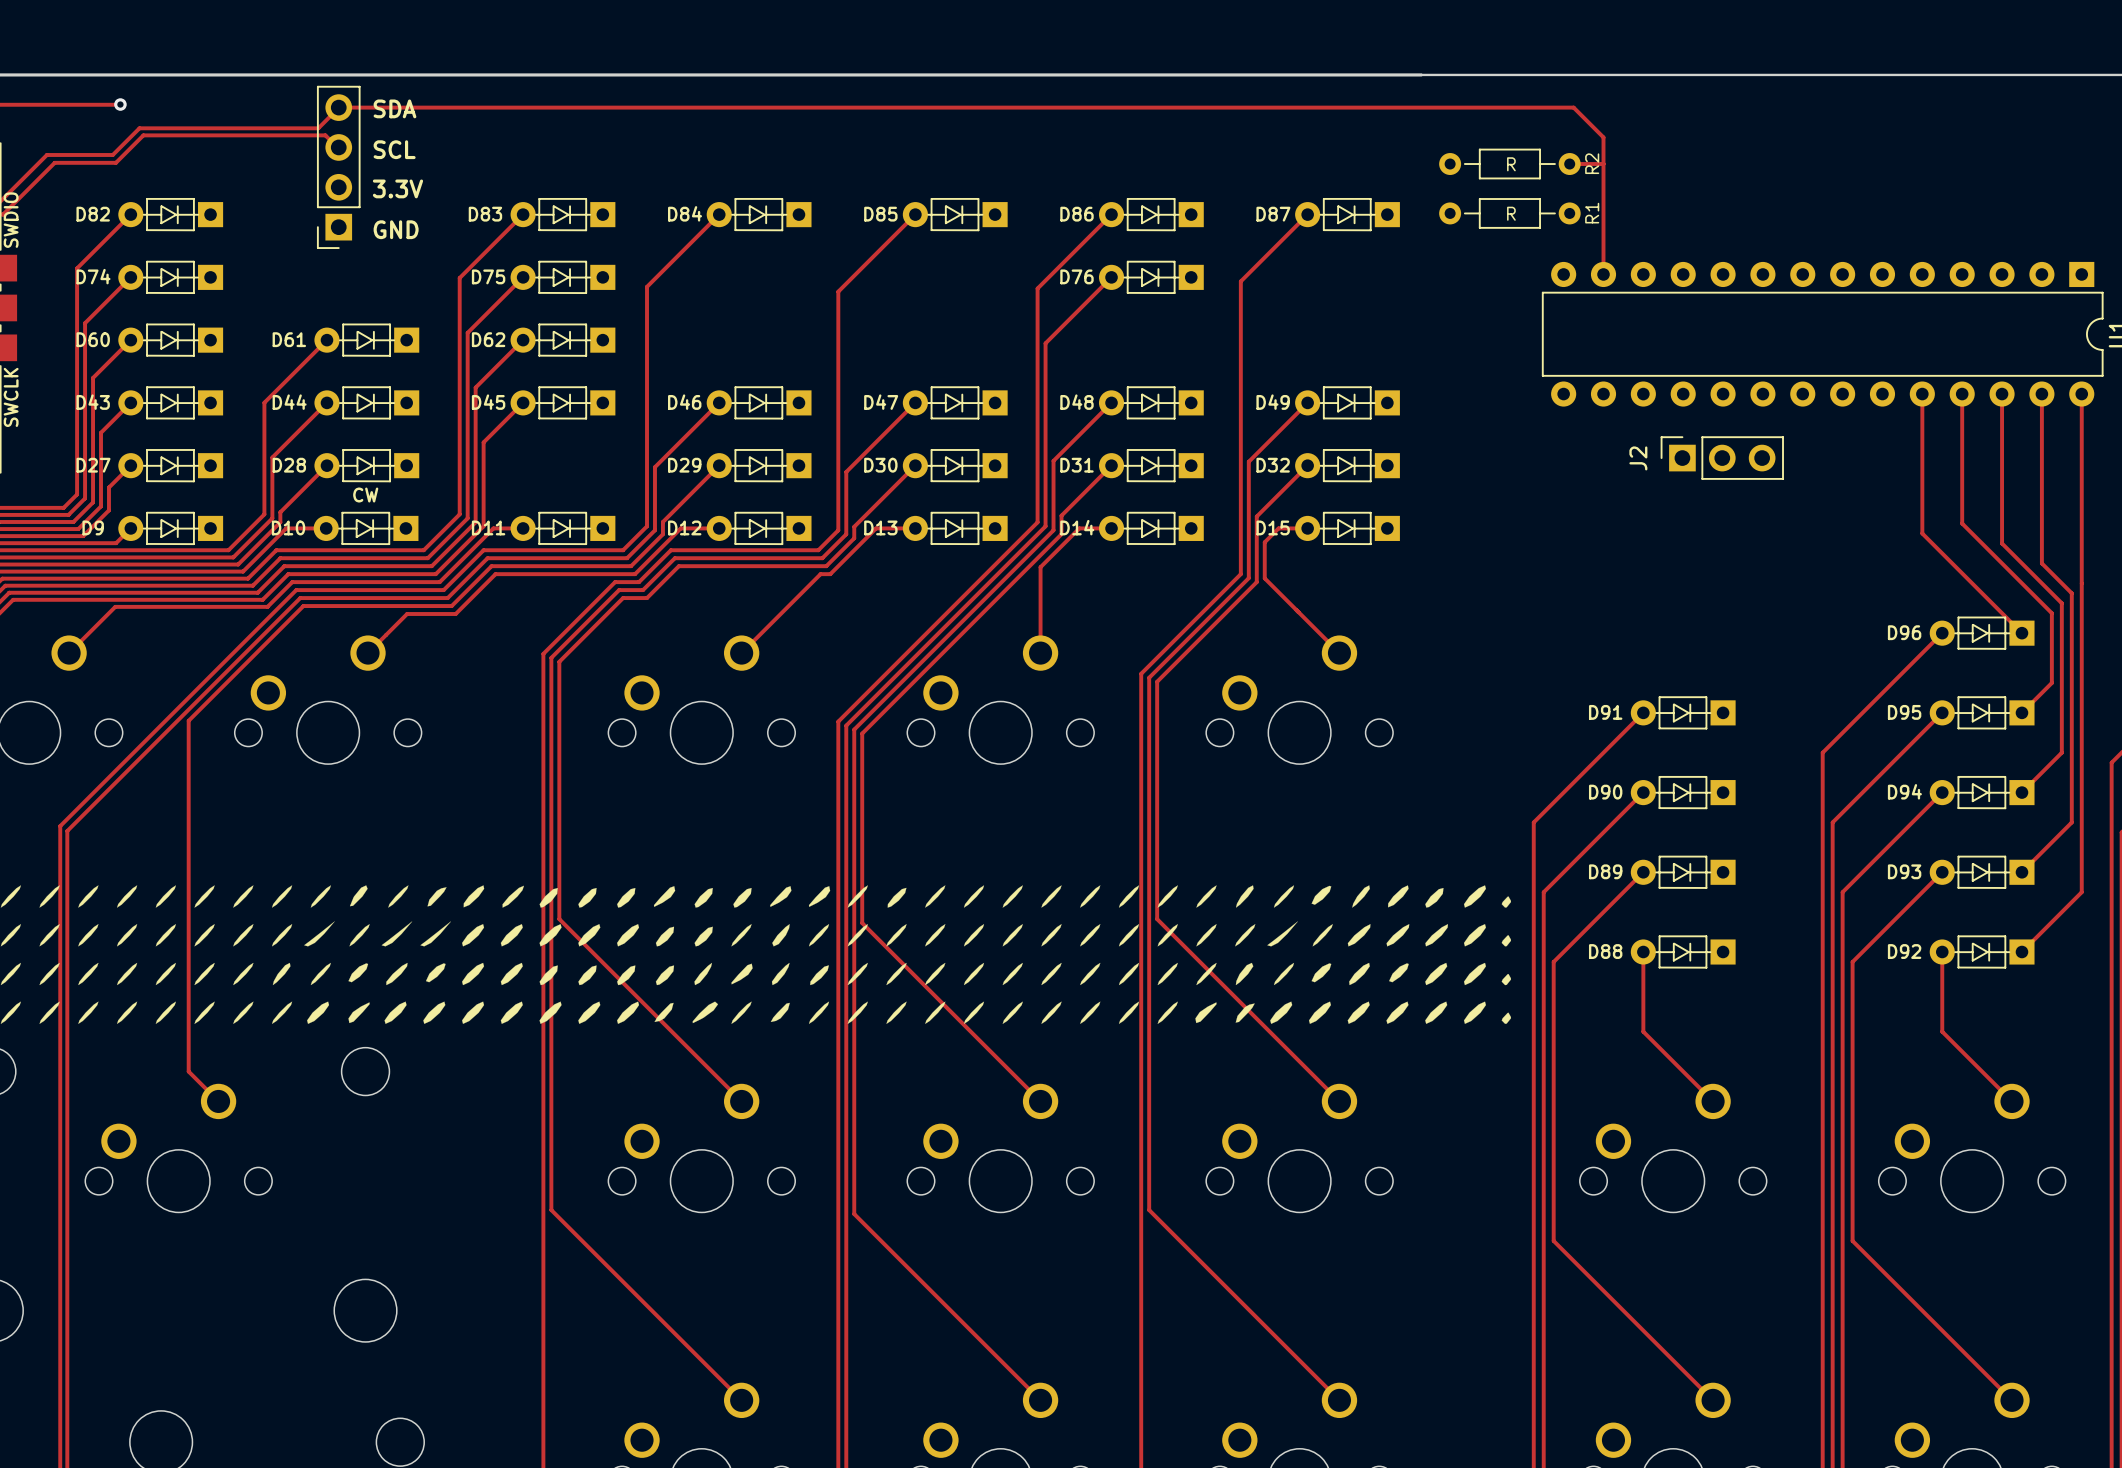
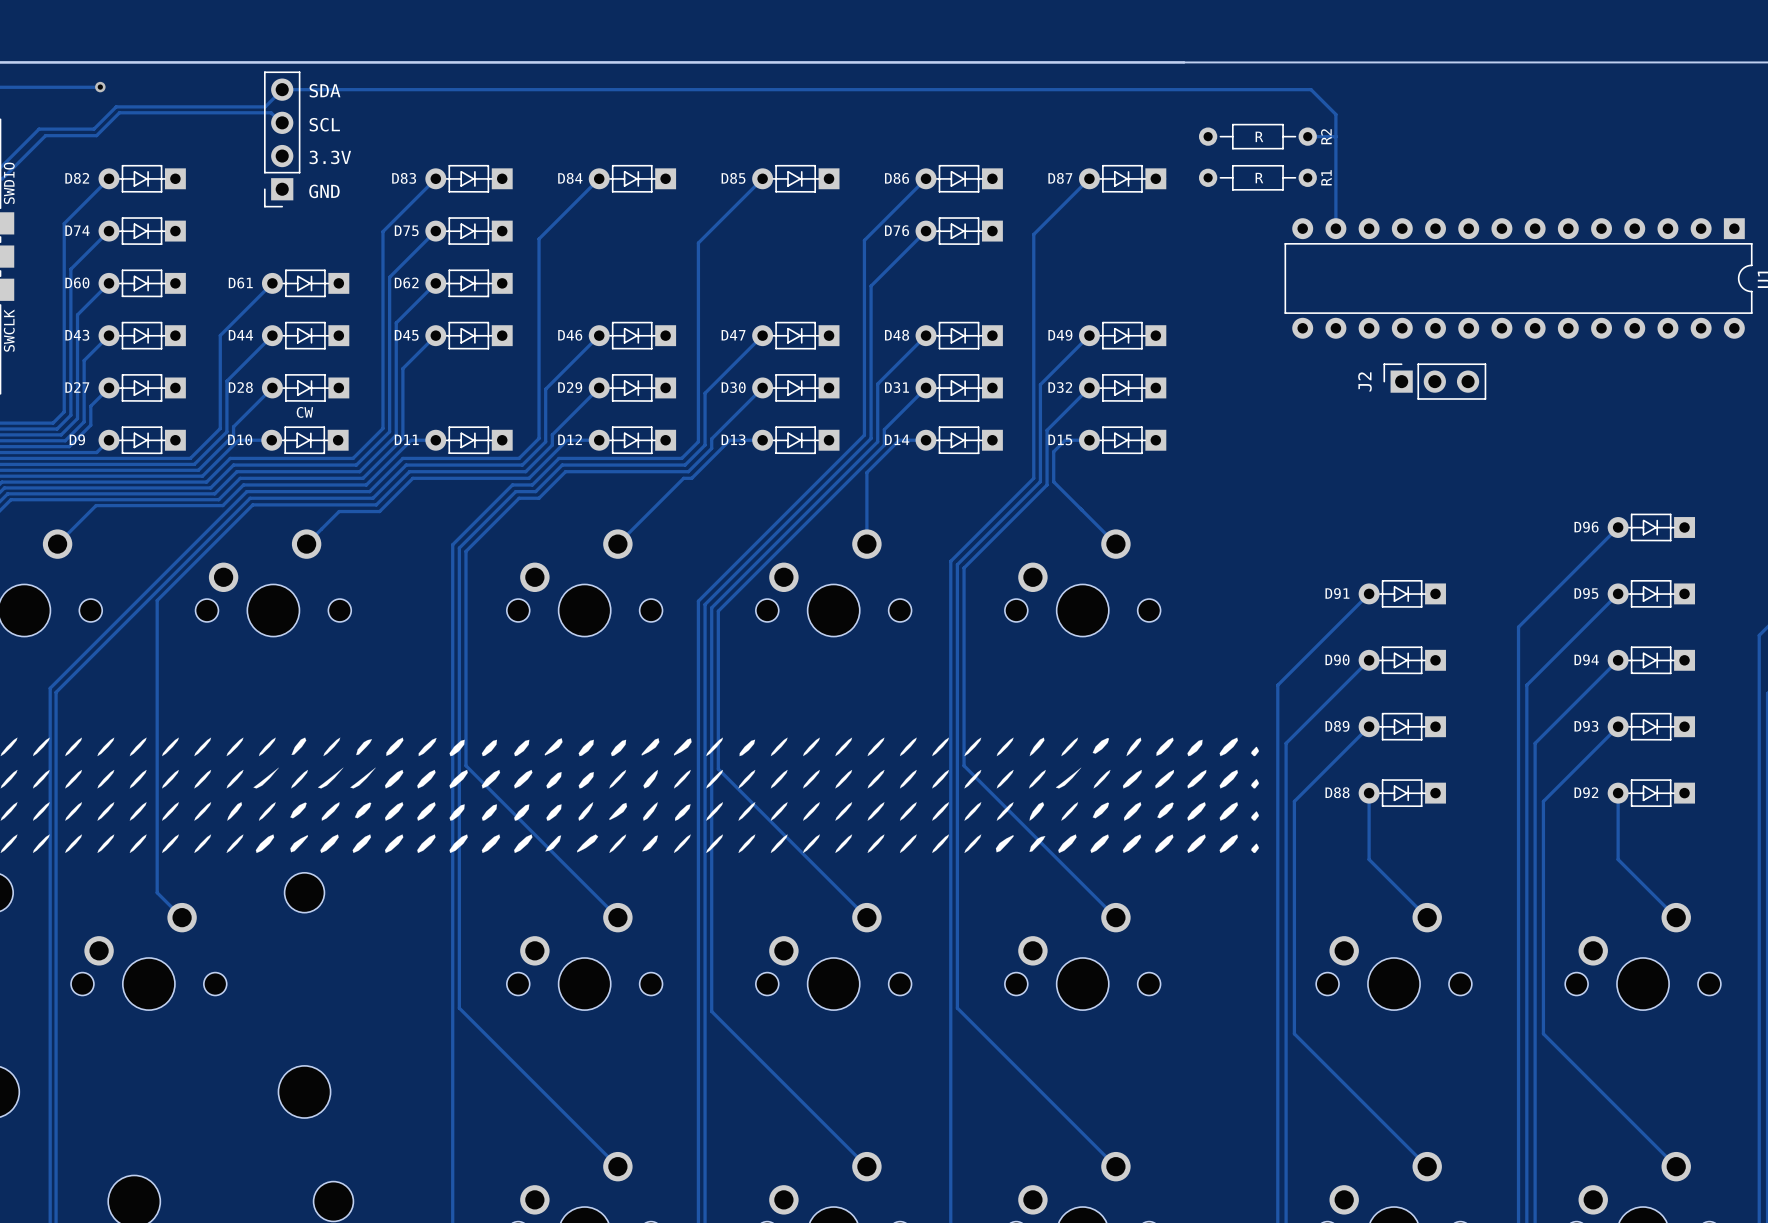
track: (1922, 394) (1922, 533) (2021, 633) -> none
track: (1962, 394) (1962, 523) (2051, 613) (2051, 682) (2021, 712) -> none
track: (2002, 394) (2002, 543) (2061, 603) (2061, 752) (2021, 792) -> none
track: (2041, 394) (2041, 563) (2071, 593) (2071, 822) (2021, 872) -> none
track: (2081, 394) (2081, 892) (2021, 952) -> none

